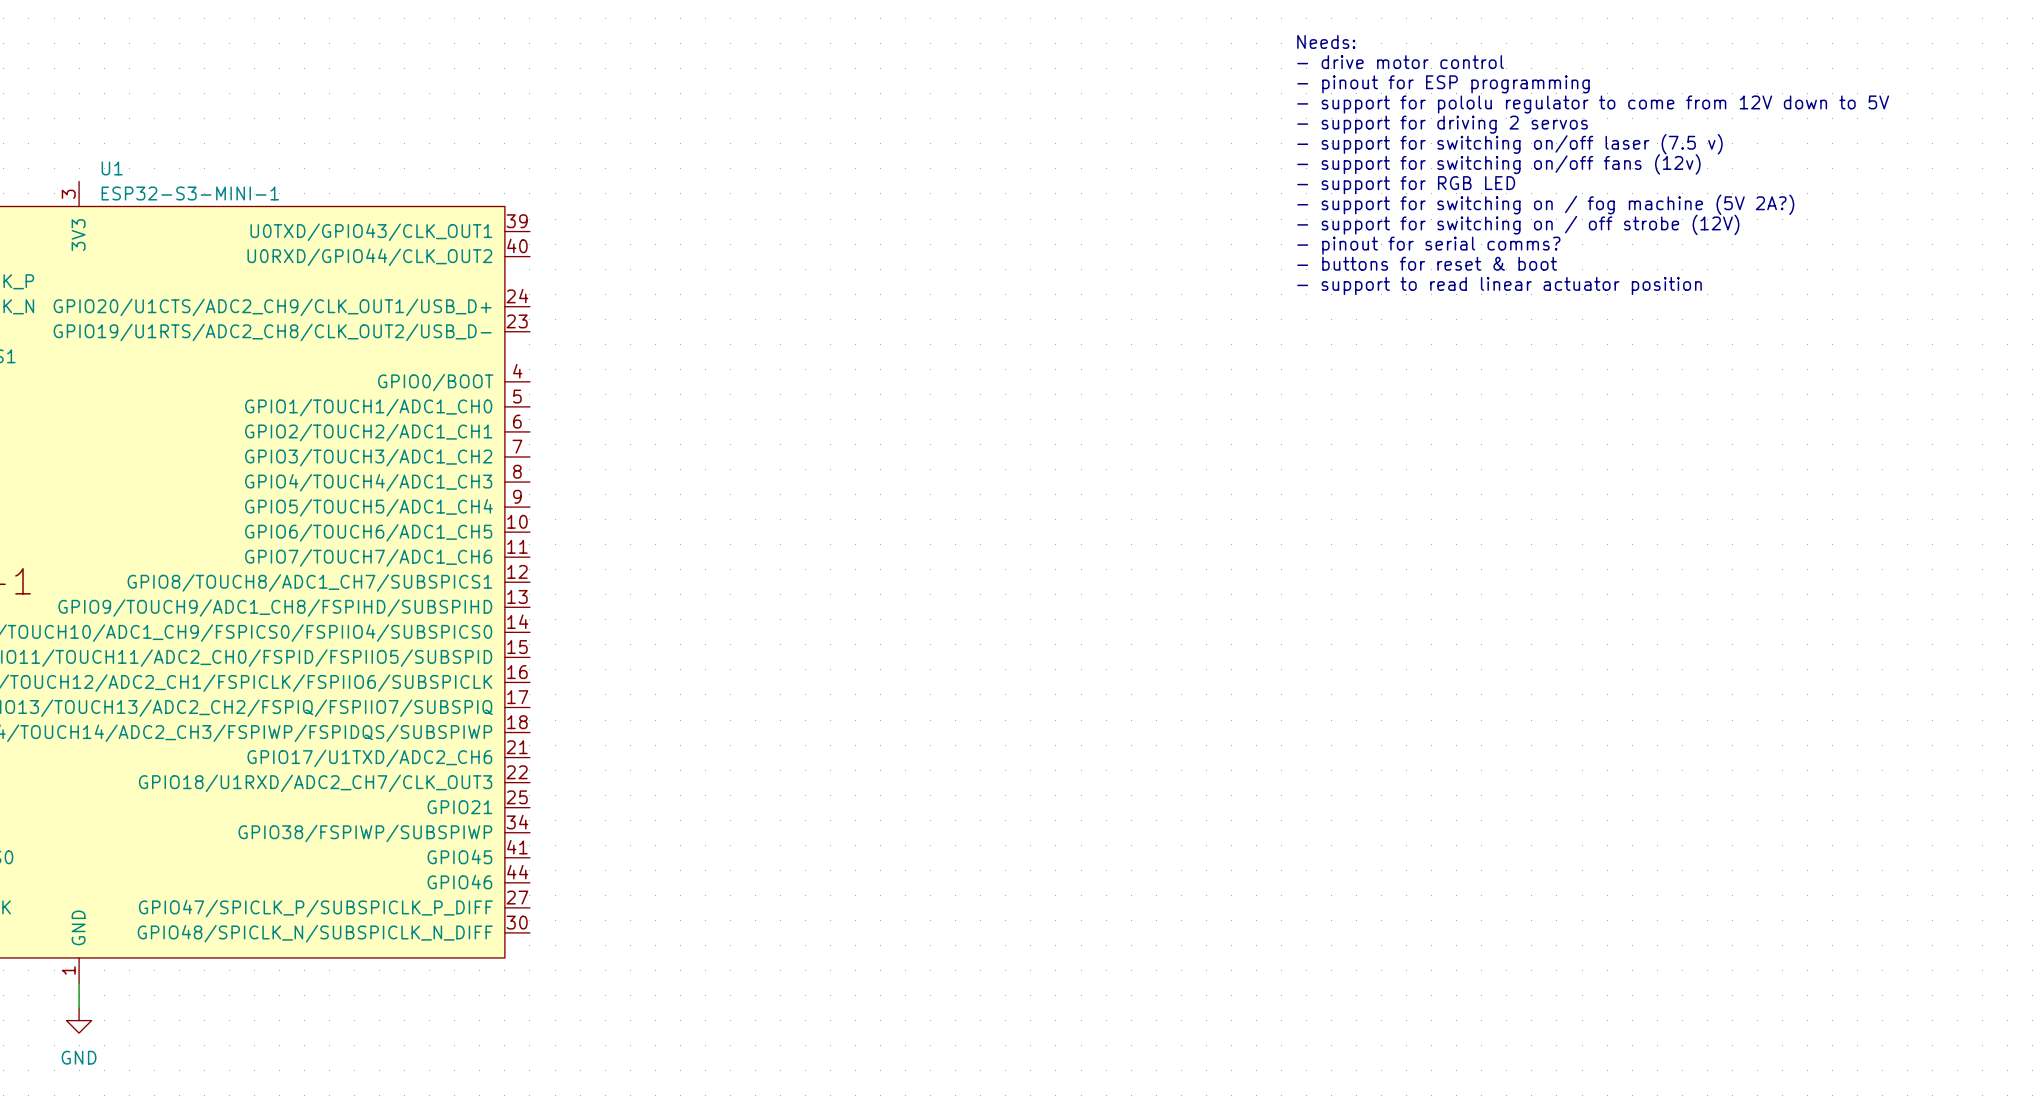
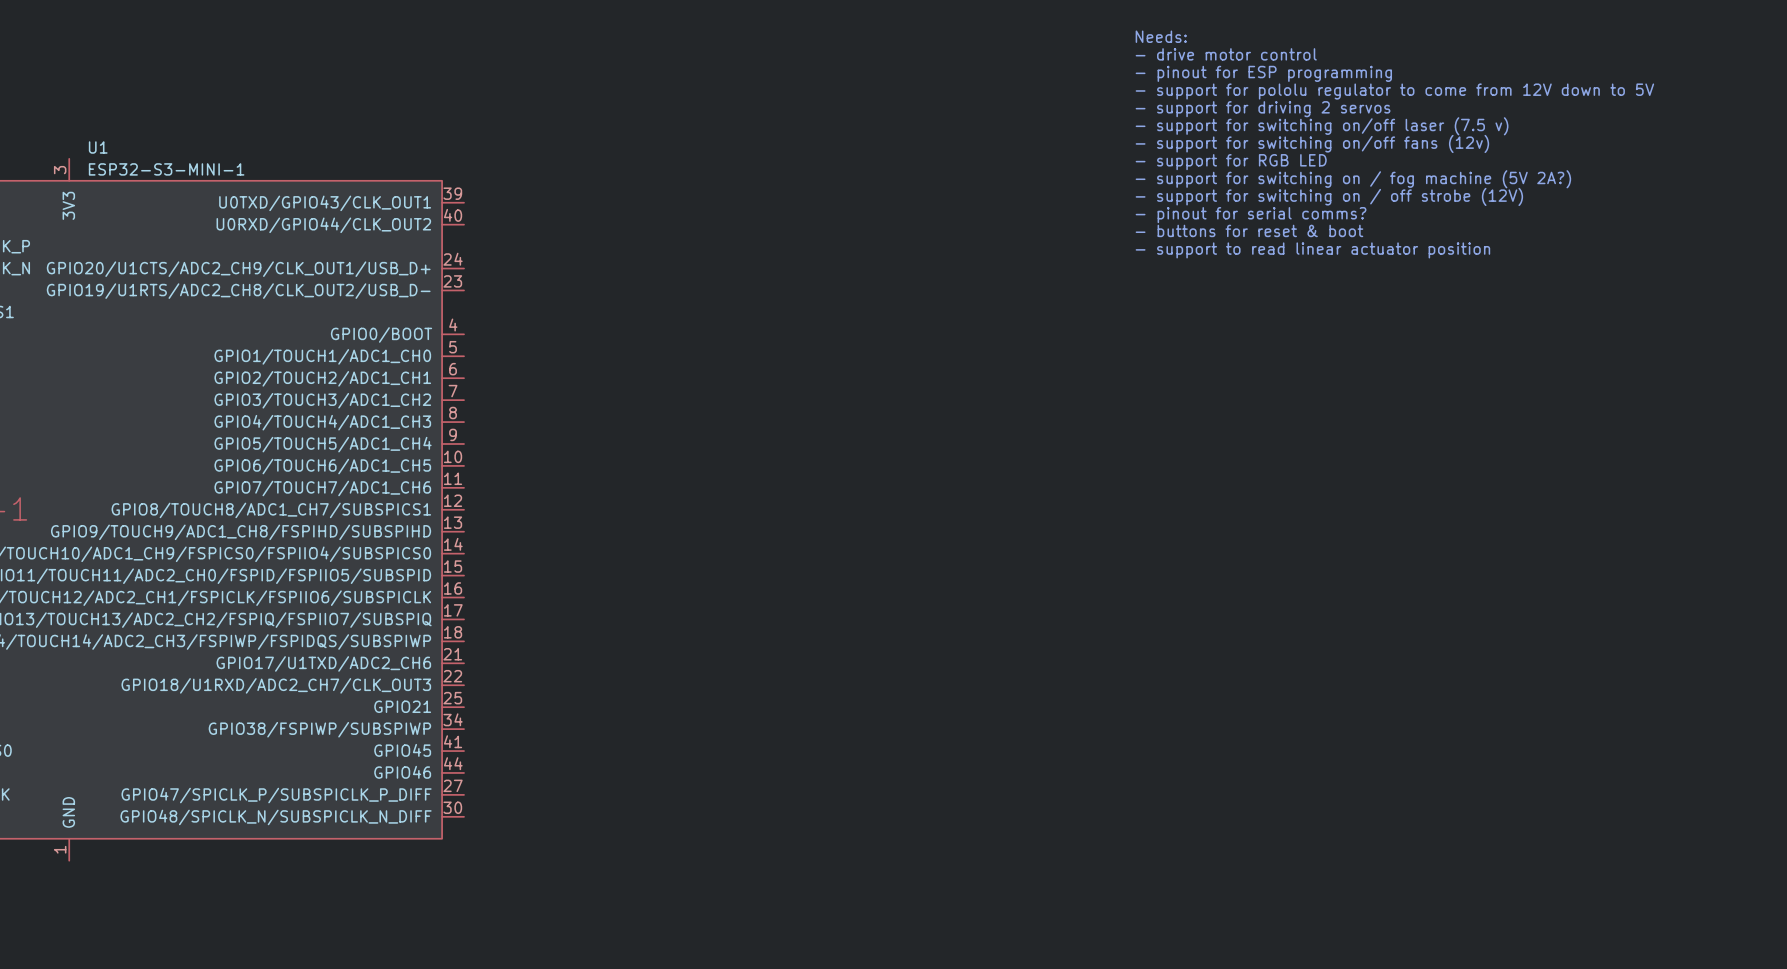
wire: (79, 983) (79, 1008) -> none
power symbol: GND (79, 1020) -> none

